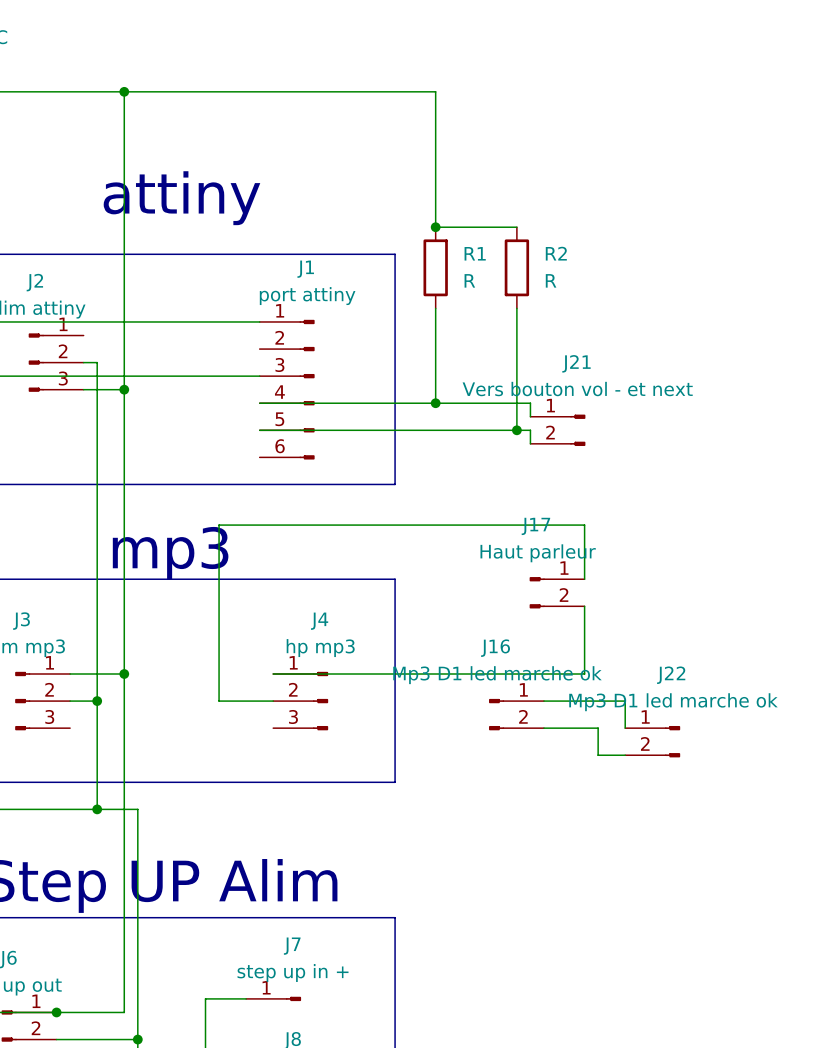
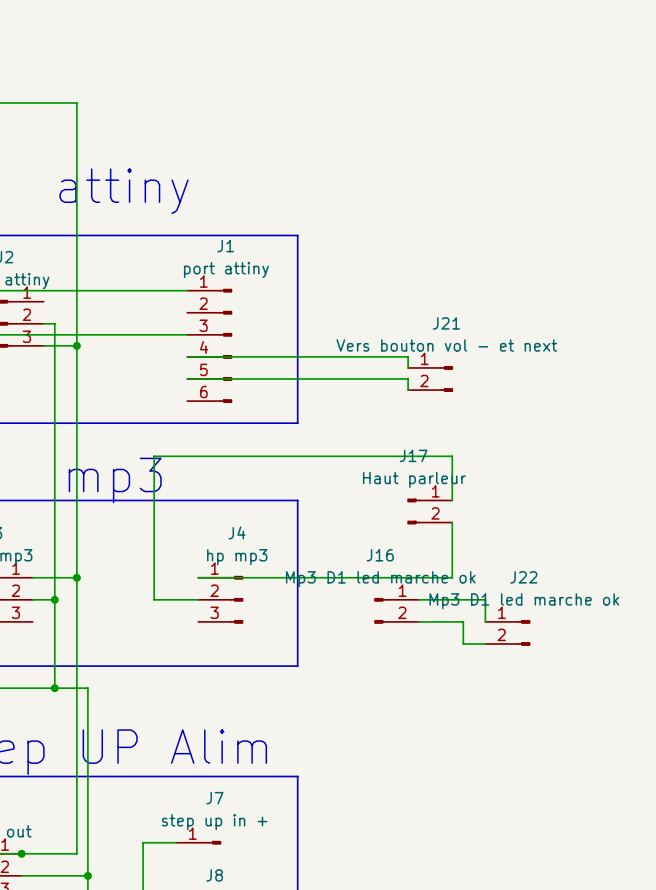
wire: (124, 91) (435, 91) (435, 227) (516, 227) -> none
junction: (124, 91) -> none
junction: (435, 227) -> none
R1: R (435, 267) -> none
R2: R (516, 267) -> none
wire: (435, 308) (435, 403) -> none
wire: (516, 308) (516, 430) -> none
junction: (435, 403) -> none
junction: (516, 430) -> none

